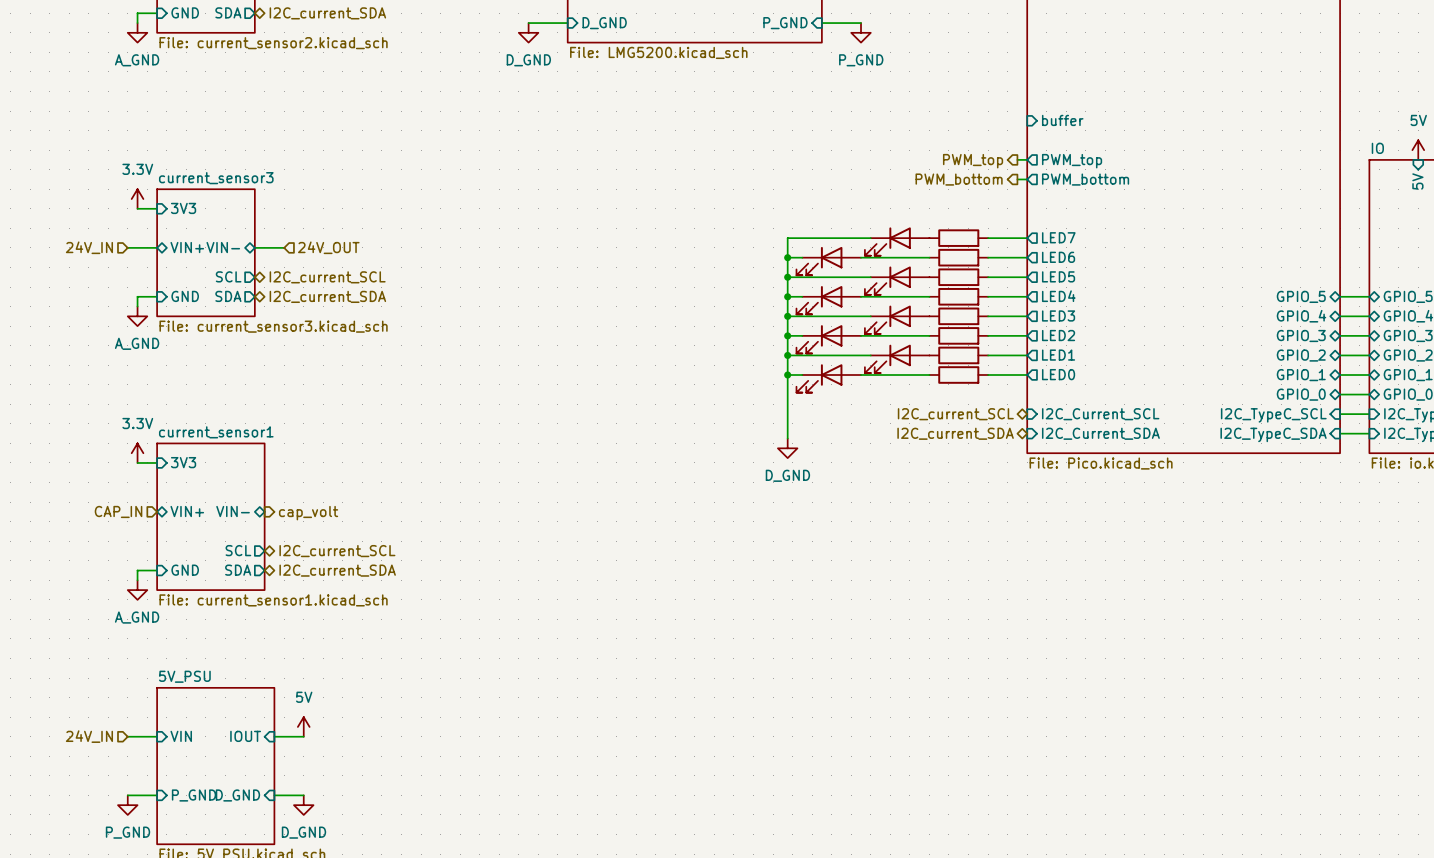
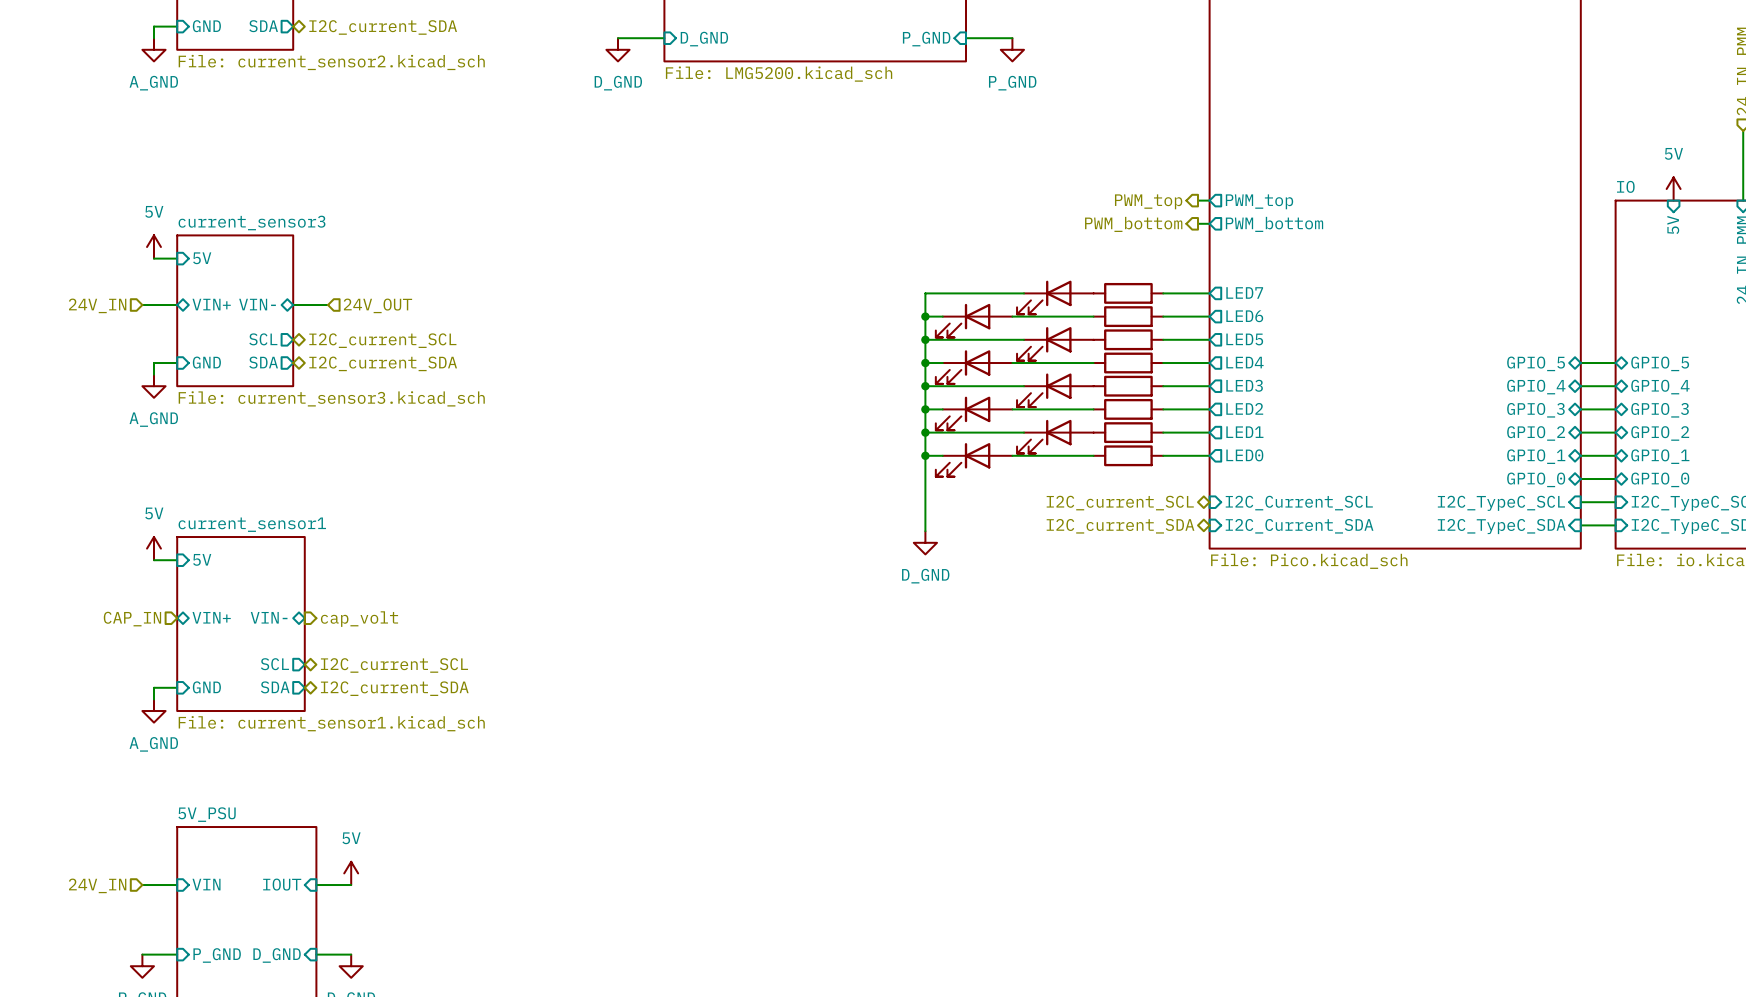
sheet pin: buffer (1062, 120) -> none
power symbol: 3.3V (137, 199) -> 5V (153, 247)
sheet pin: 3V3 (183, 208) -> 5V (202, 258)
power symbol: 3.3V (137, 453) -> 5V (153, 548)
sheet pin: 3V3 (183, 462) -> 5V (202, 559)

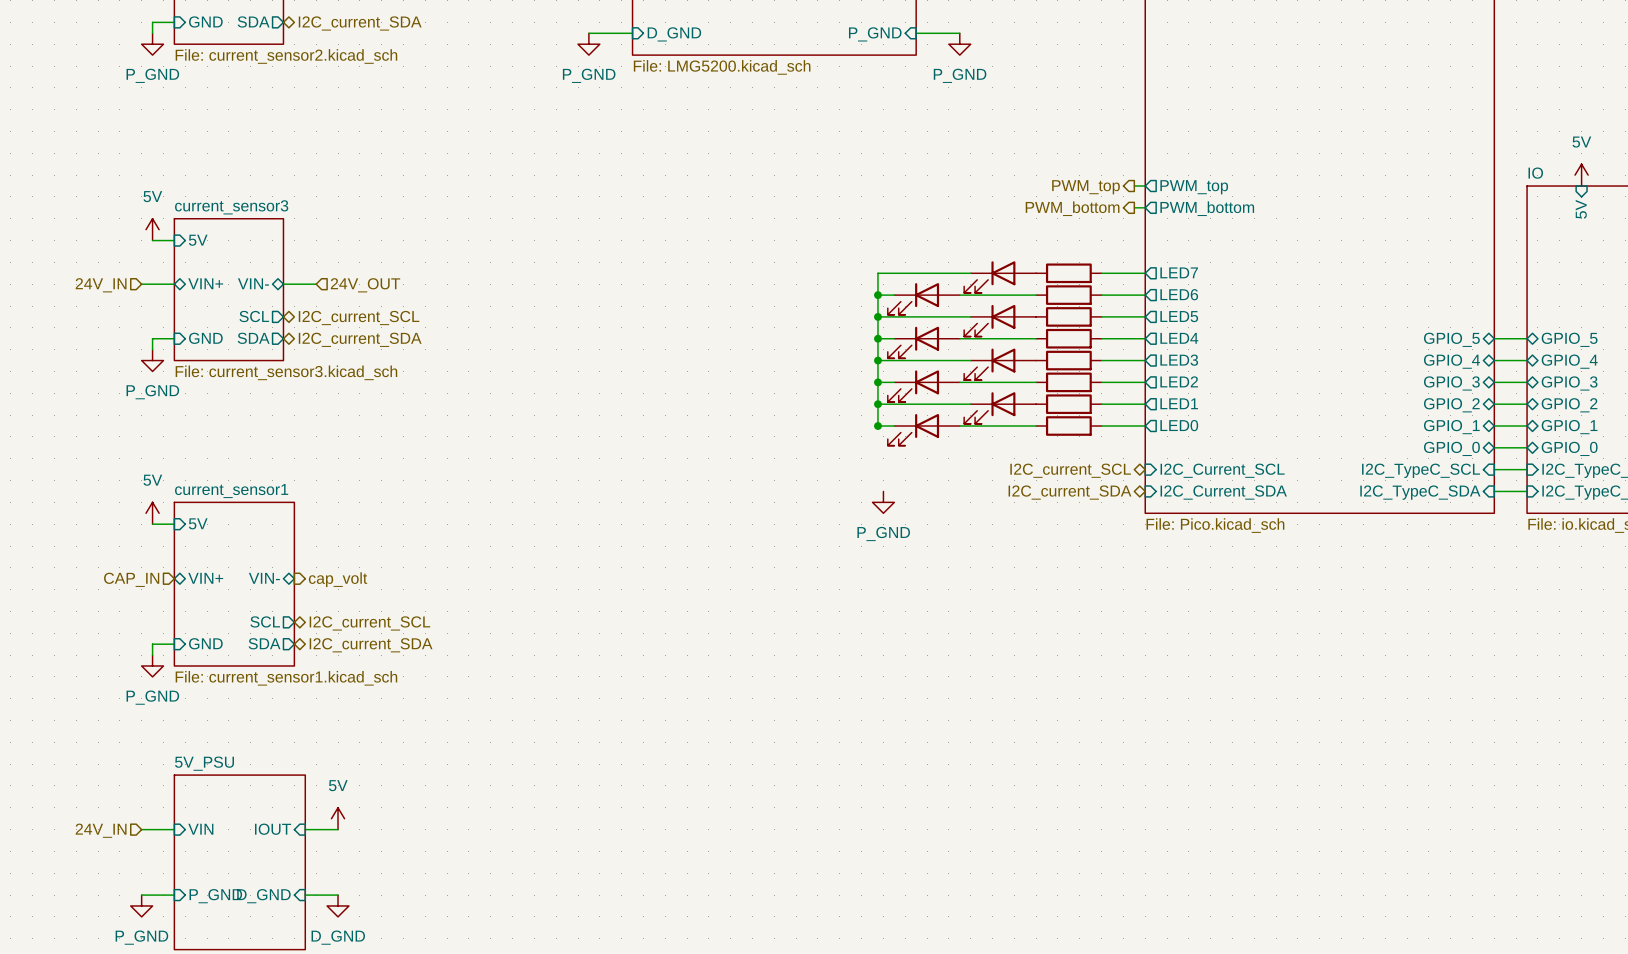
power symbol: A_GND (153, 49) -> P_GND (152, 44)
power symbol: D_GND (618, 49) -> P_GND (588, 44)
power symbol: A_GND (153, 386) -> P_GND (152, 360)
wire: (925, 455) (925, 531) -> none
power symbol: D_GND (925, 542) -> P_GND (883, 502)
power symbol: A_GND (153, 711) -> P_GND (152, 665)

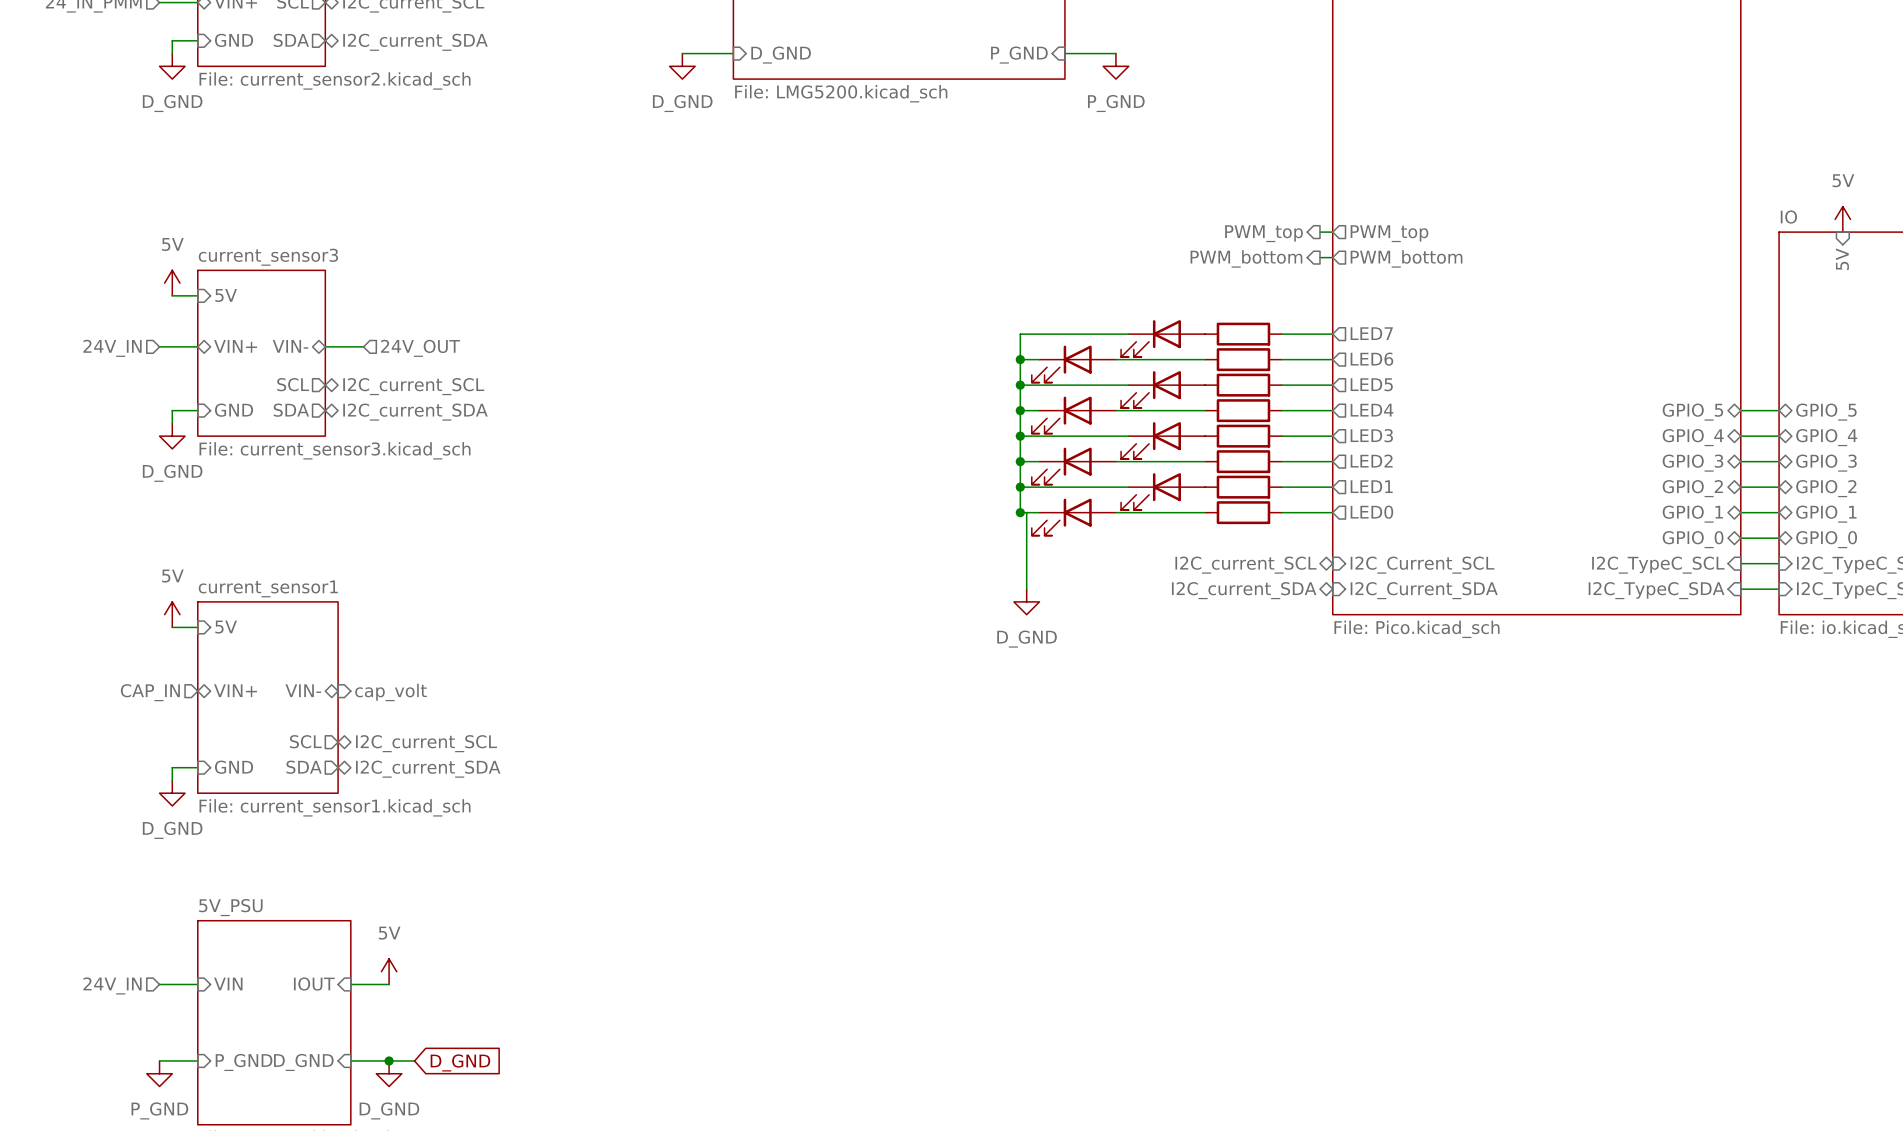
power symbol: P_GND (152, 44) -> D_GND (172, 66)
power symbol: P_GND (588, 44) -> D_GND (682, 66)
power symbol: P_GND (152, 360) -> D_GND (172, 436)
wire: none -> (1026, 512) (1026, 589)
power symbol: P_GND (883, 502) -> D_GND (1026, 601)
power symbol: P_GND (152, 665) -> D_GND (172, 793)
wire: none -> (389, 1060) (414, 1060)
junction: none -> (389, 1060)
global label: none -> D_GND (460, 1062)

